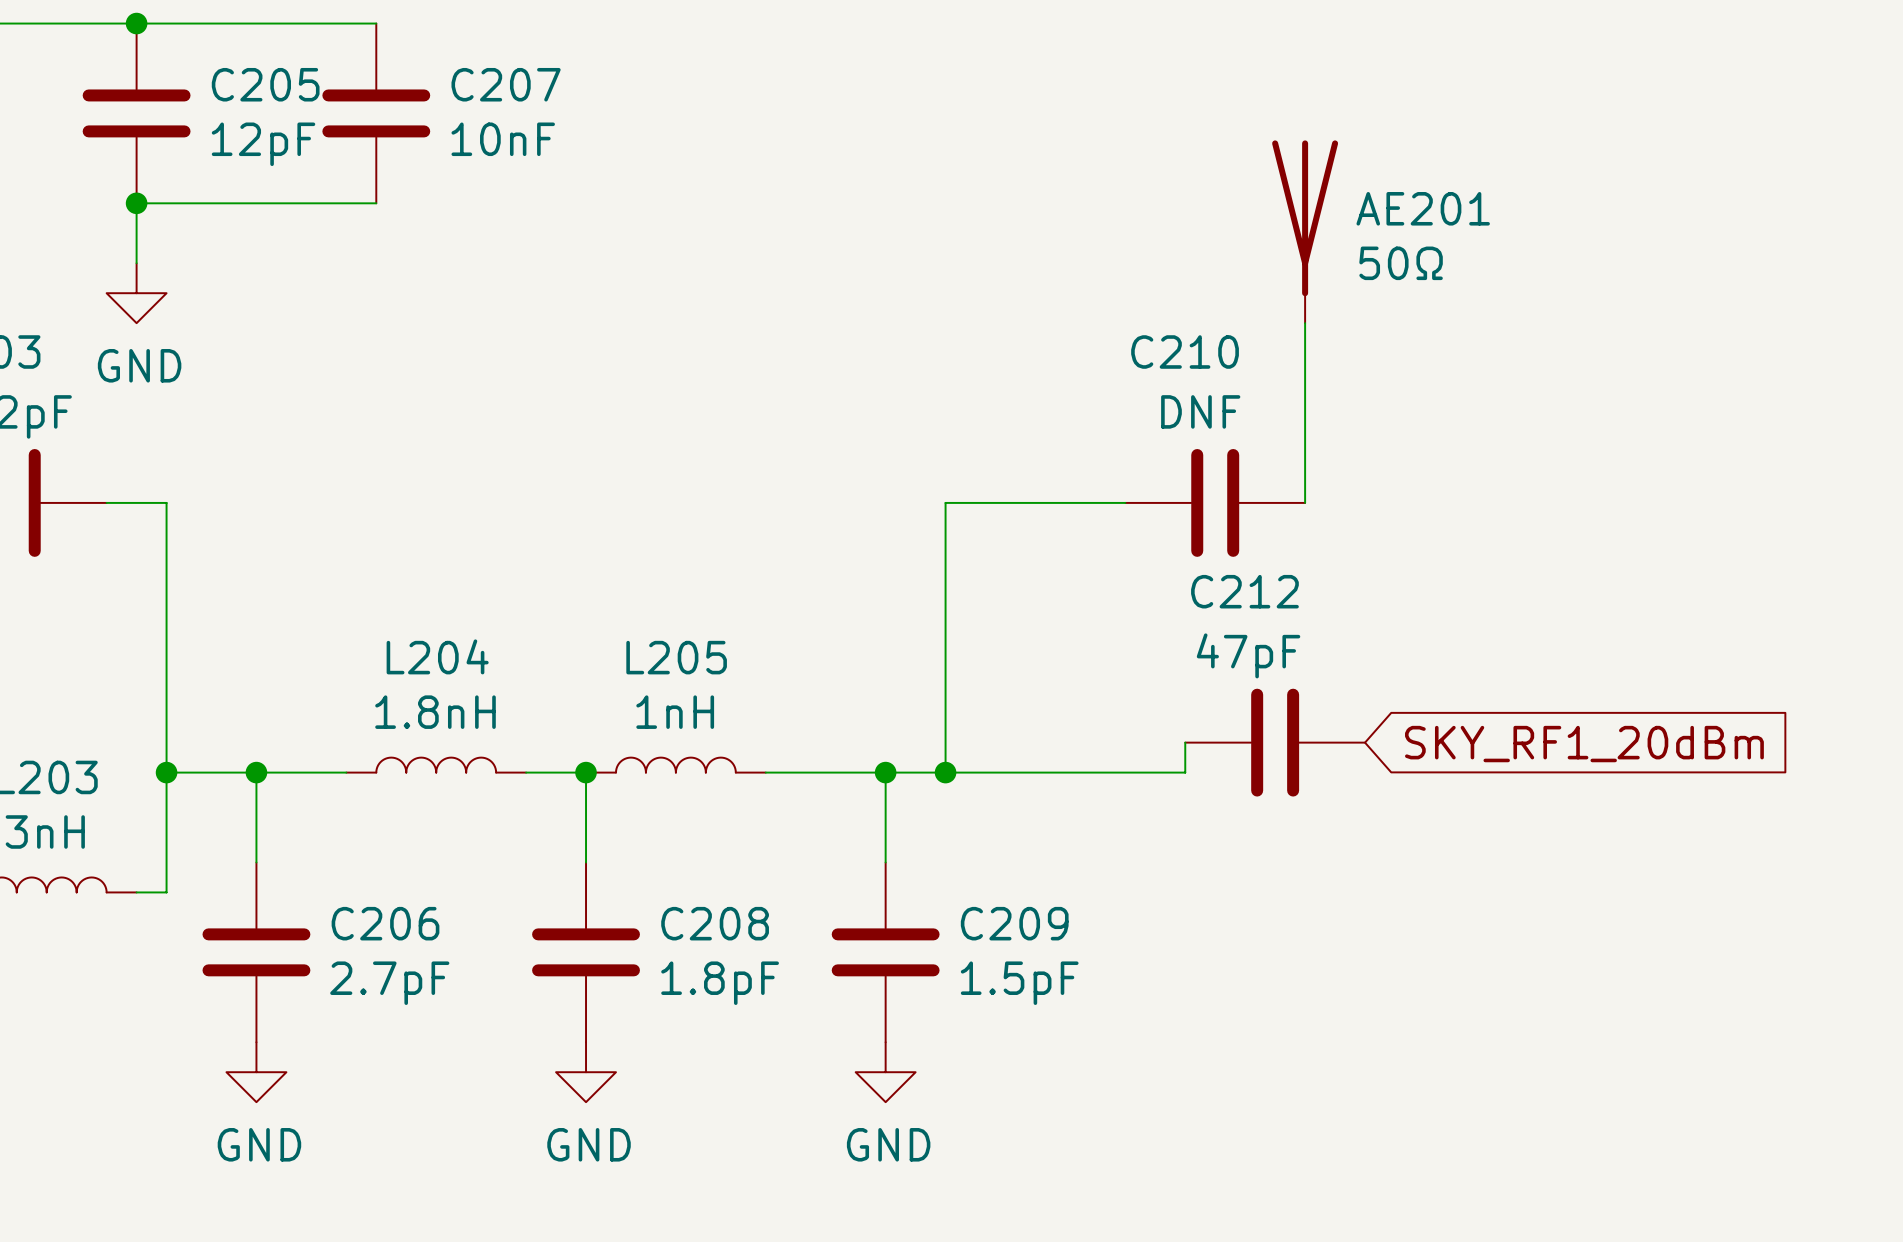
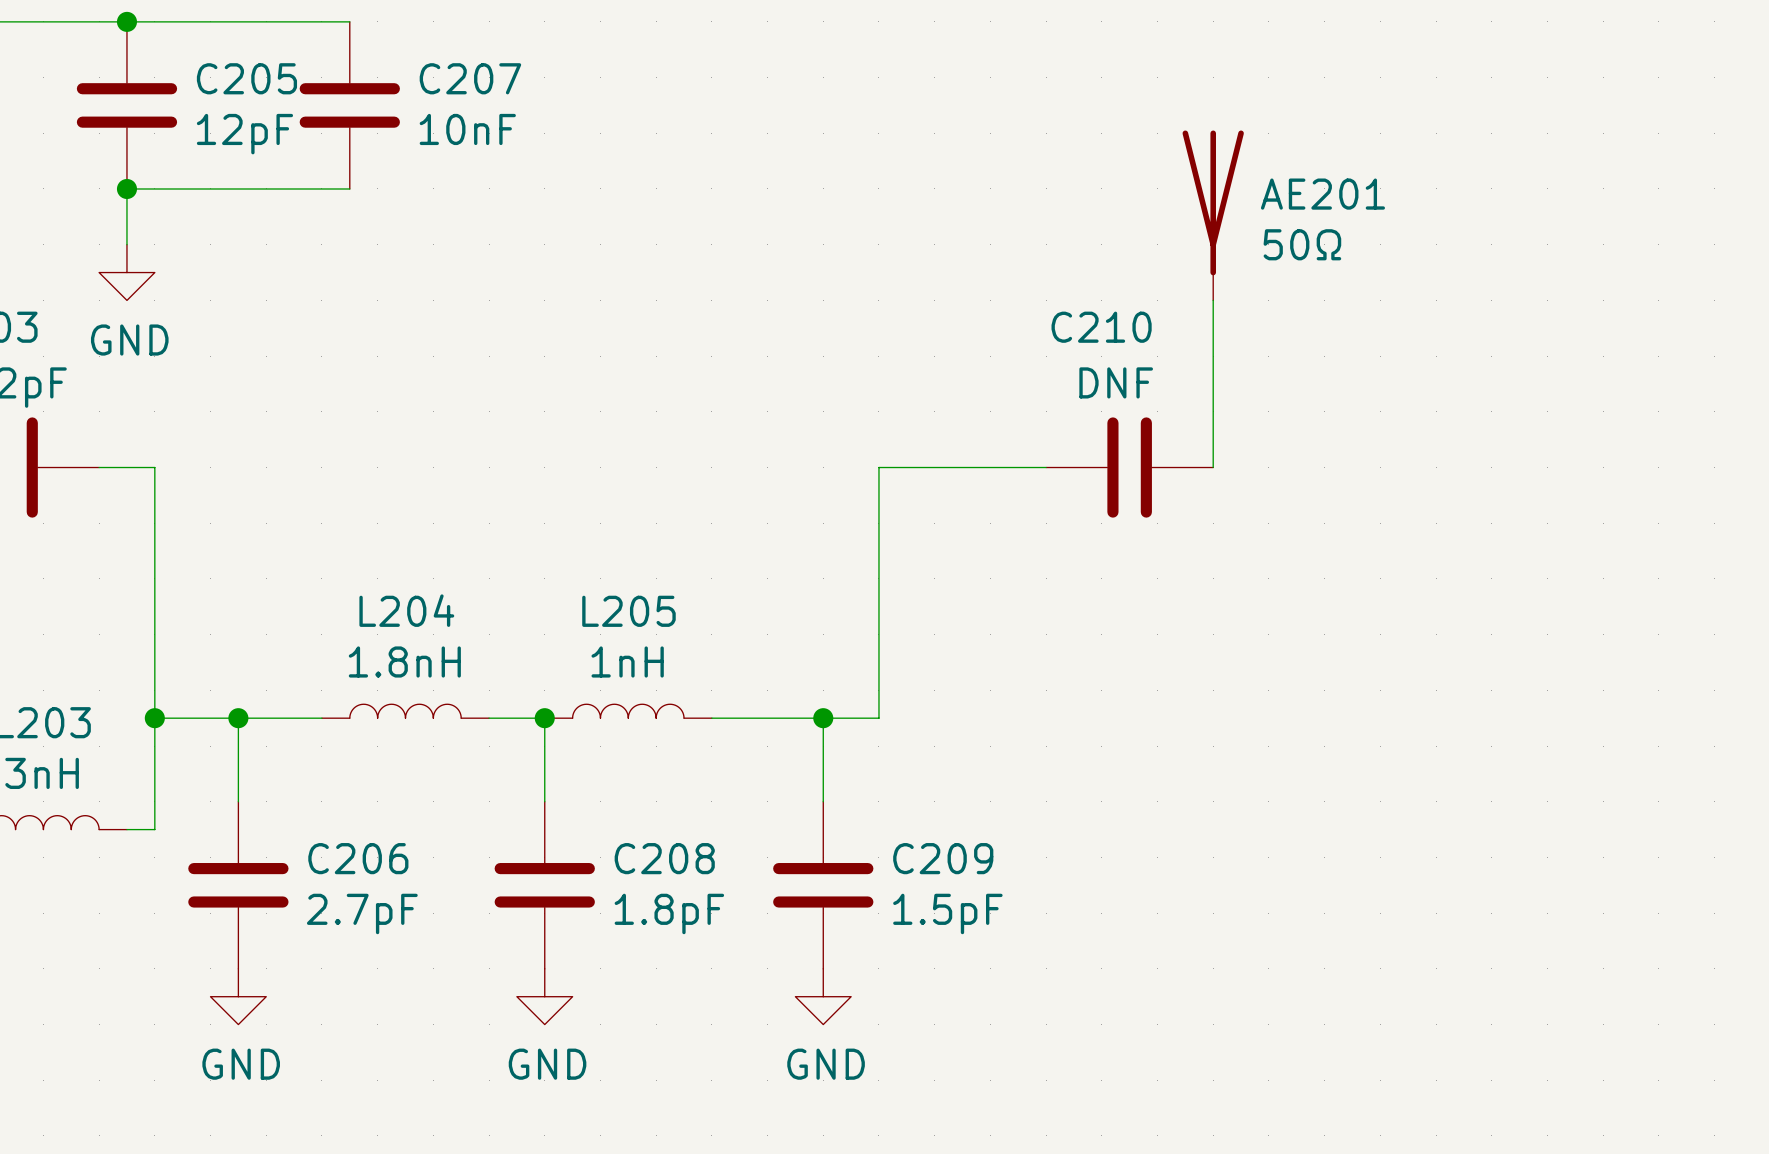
wire: (1185, 742) (1185, 772) (945, 772) -> none
C212: 47pF (1275, 742) -> none
global label: SKY_RF1_20dBm (1584, 744) -> none
junction: (945, 772) -> none

